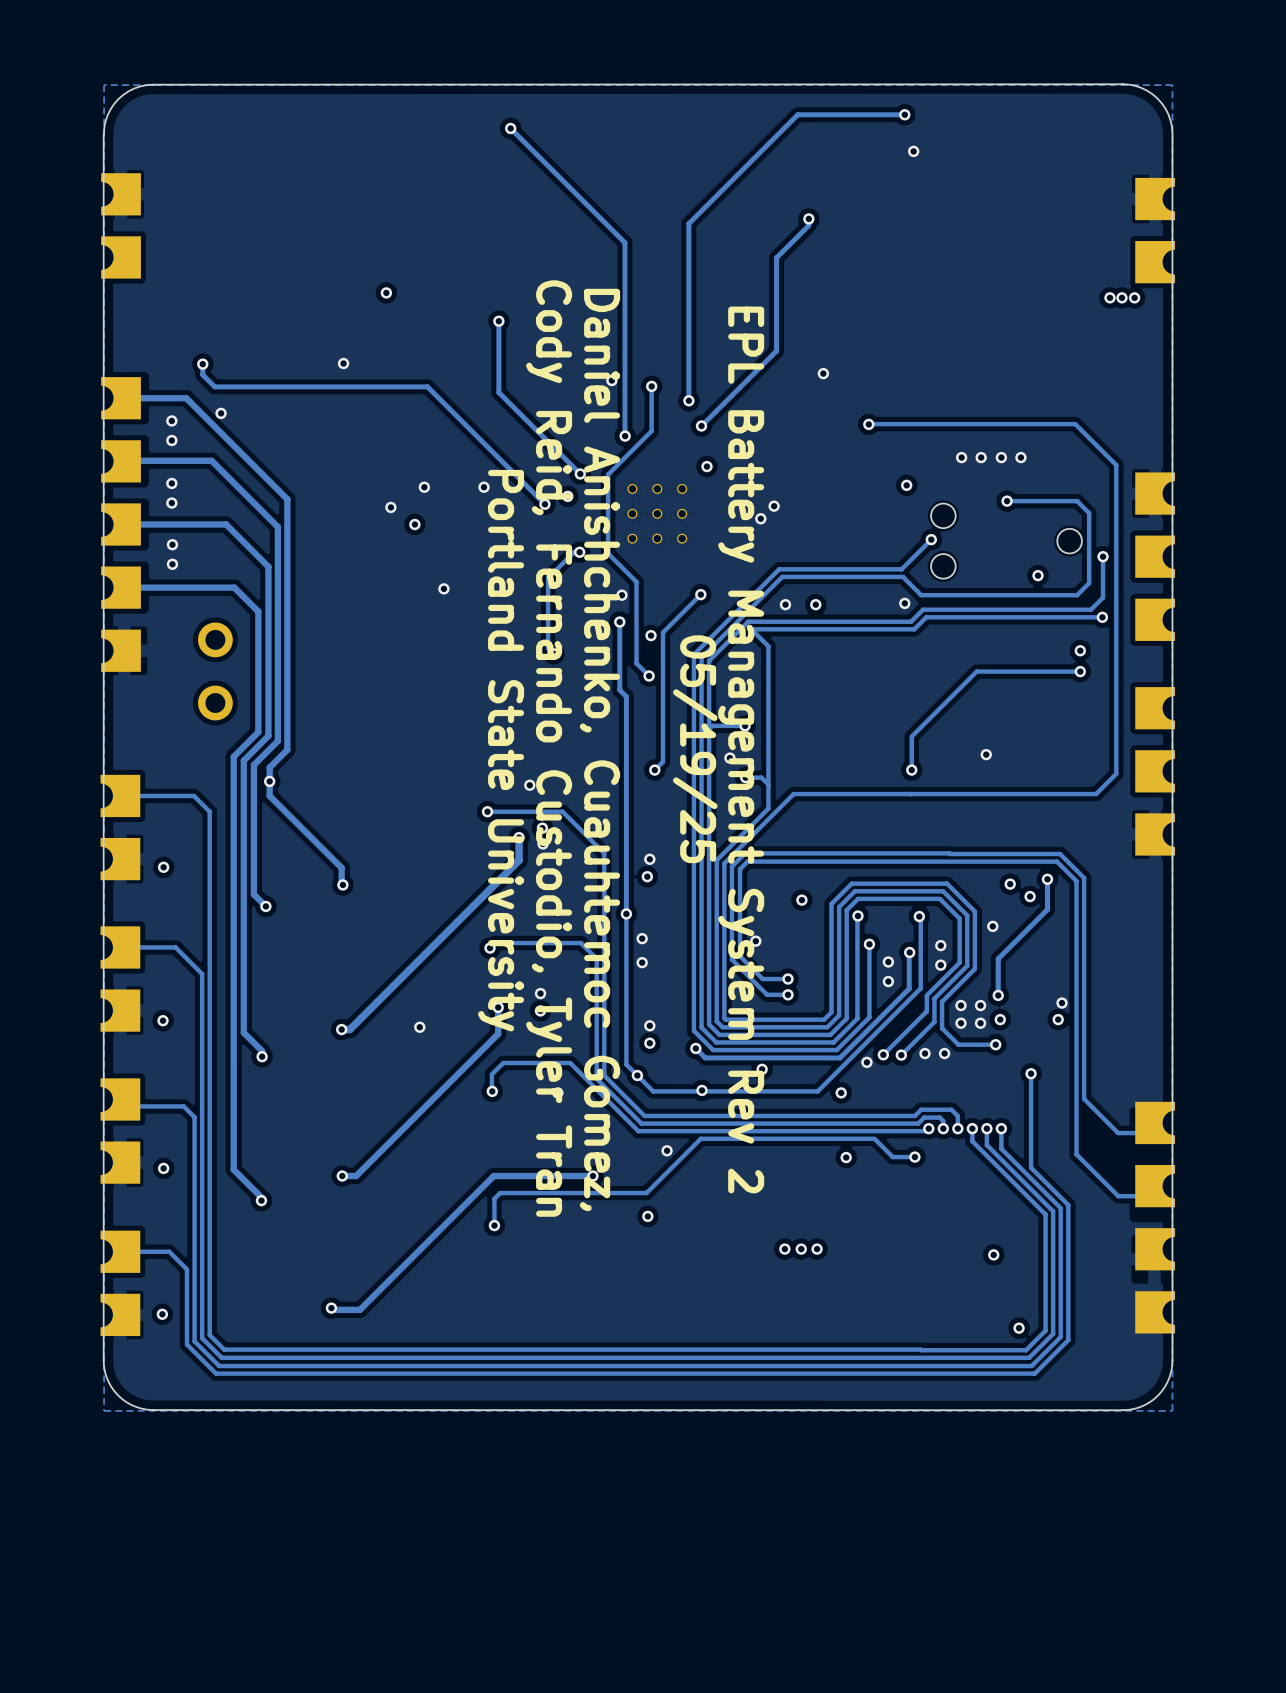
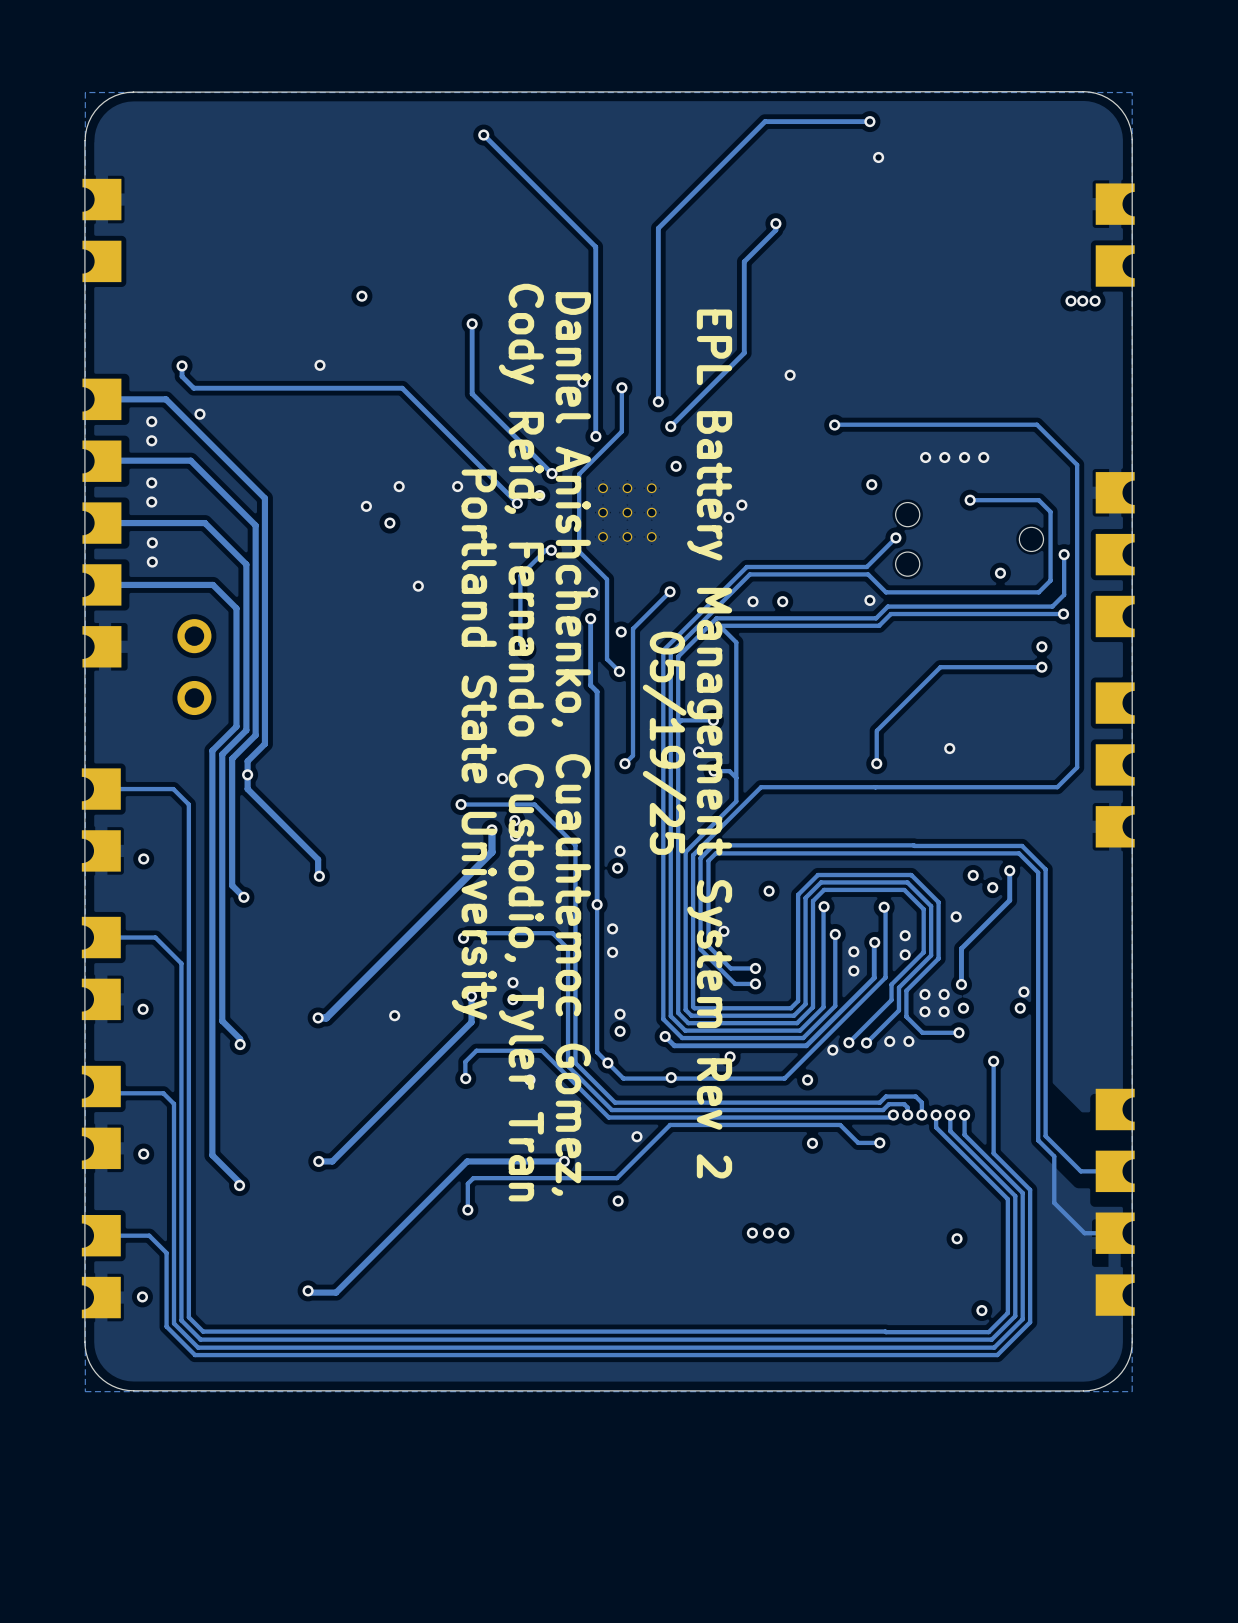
track: (1084, 1099) (1118, 1133) (1174, 1133) -> (1045, 1086) (1045, 1136) (1080, 1171) (1134, 1171)
track: (1092, 1170) (1118, 1196) (1174, 1196) -> (1054, 1156) (1054, 1202) (1084, 1233) (1134, 1233)

